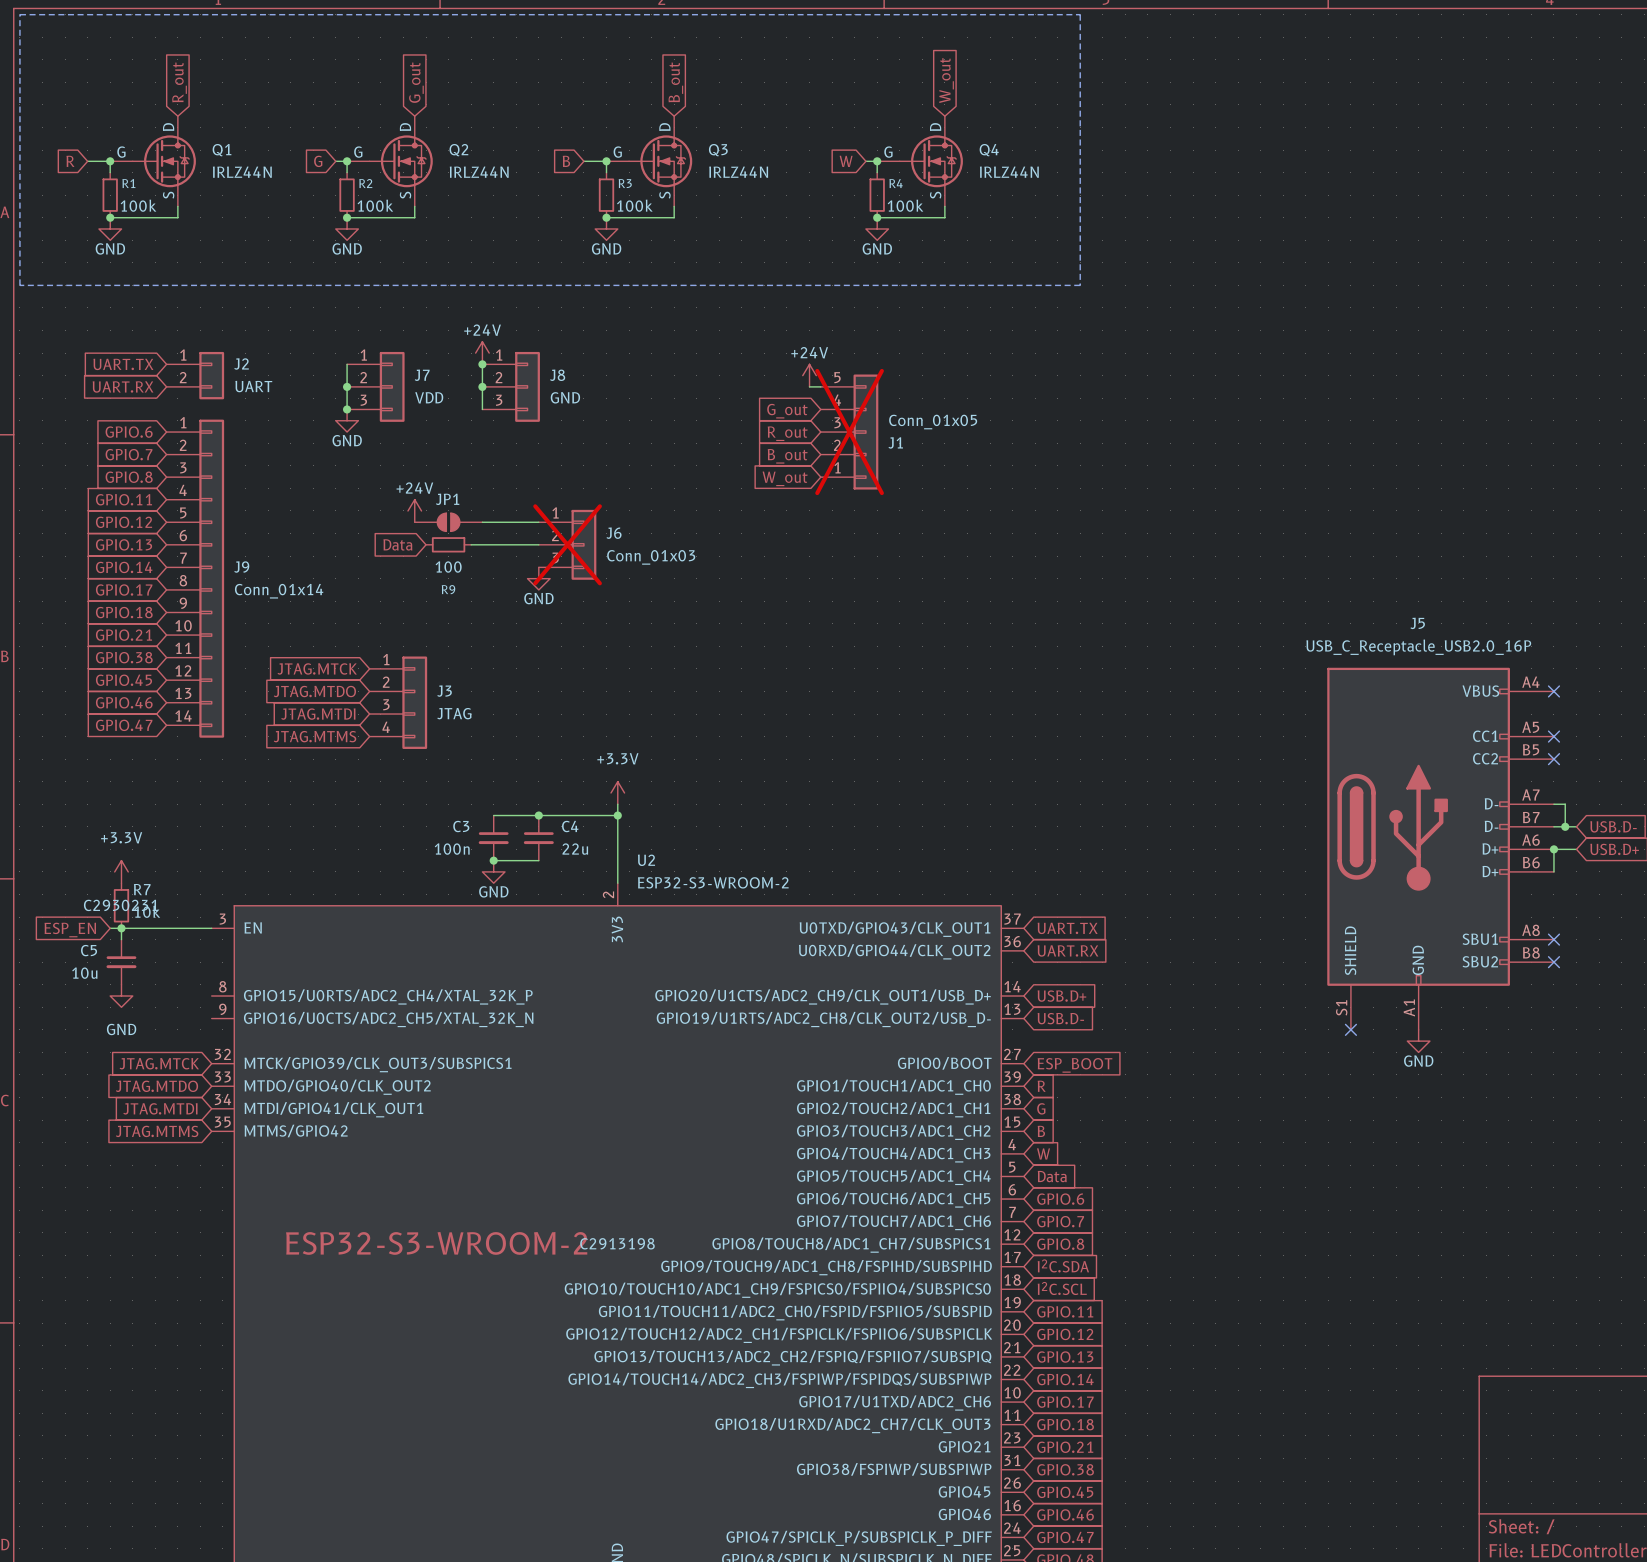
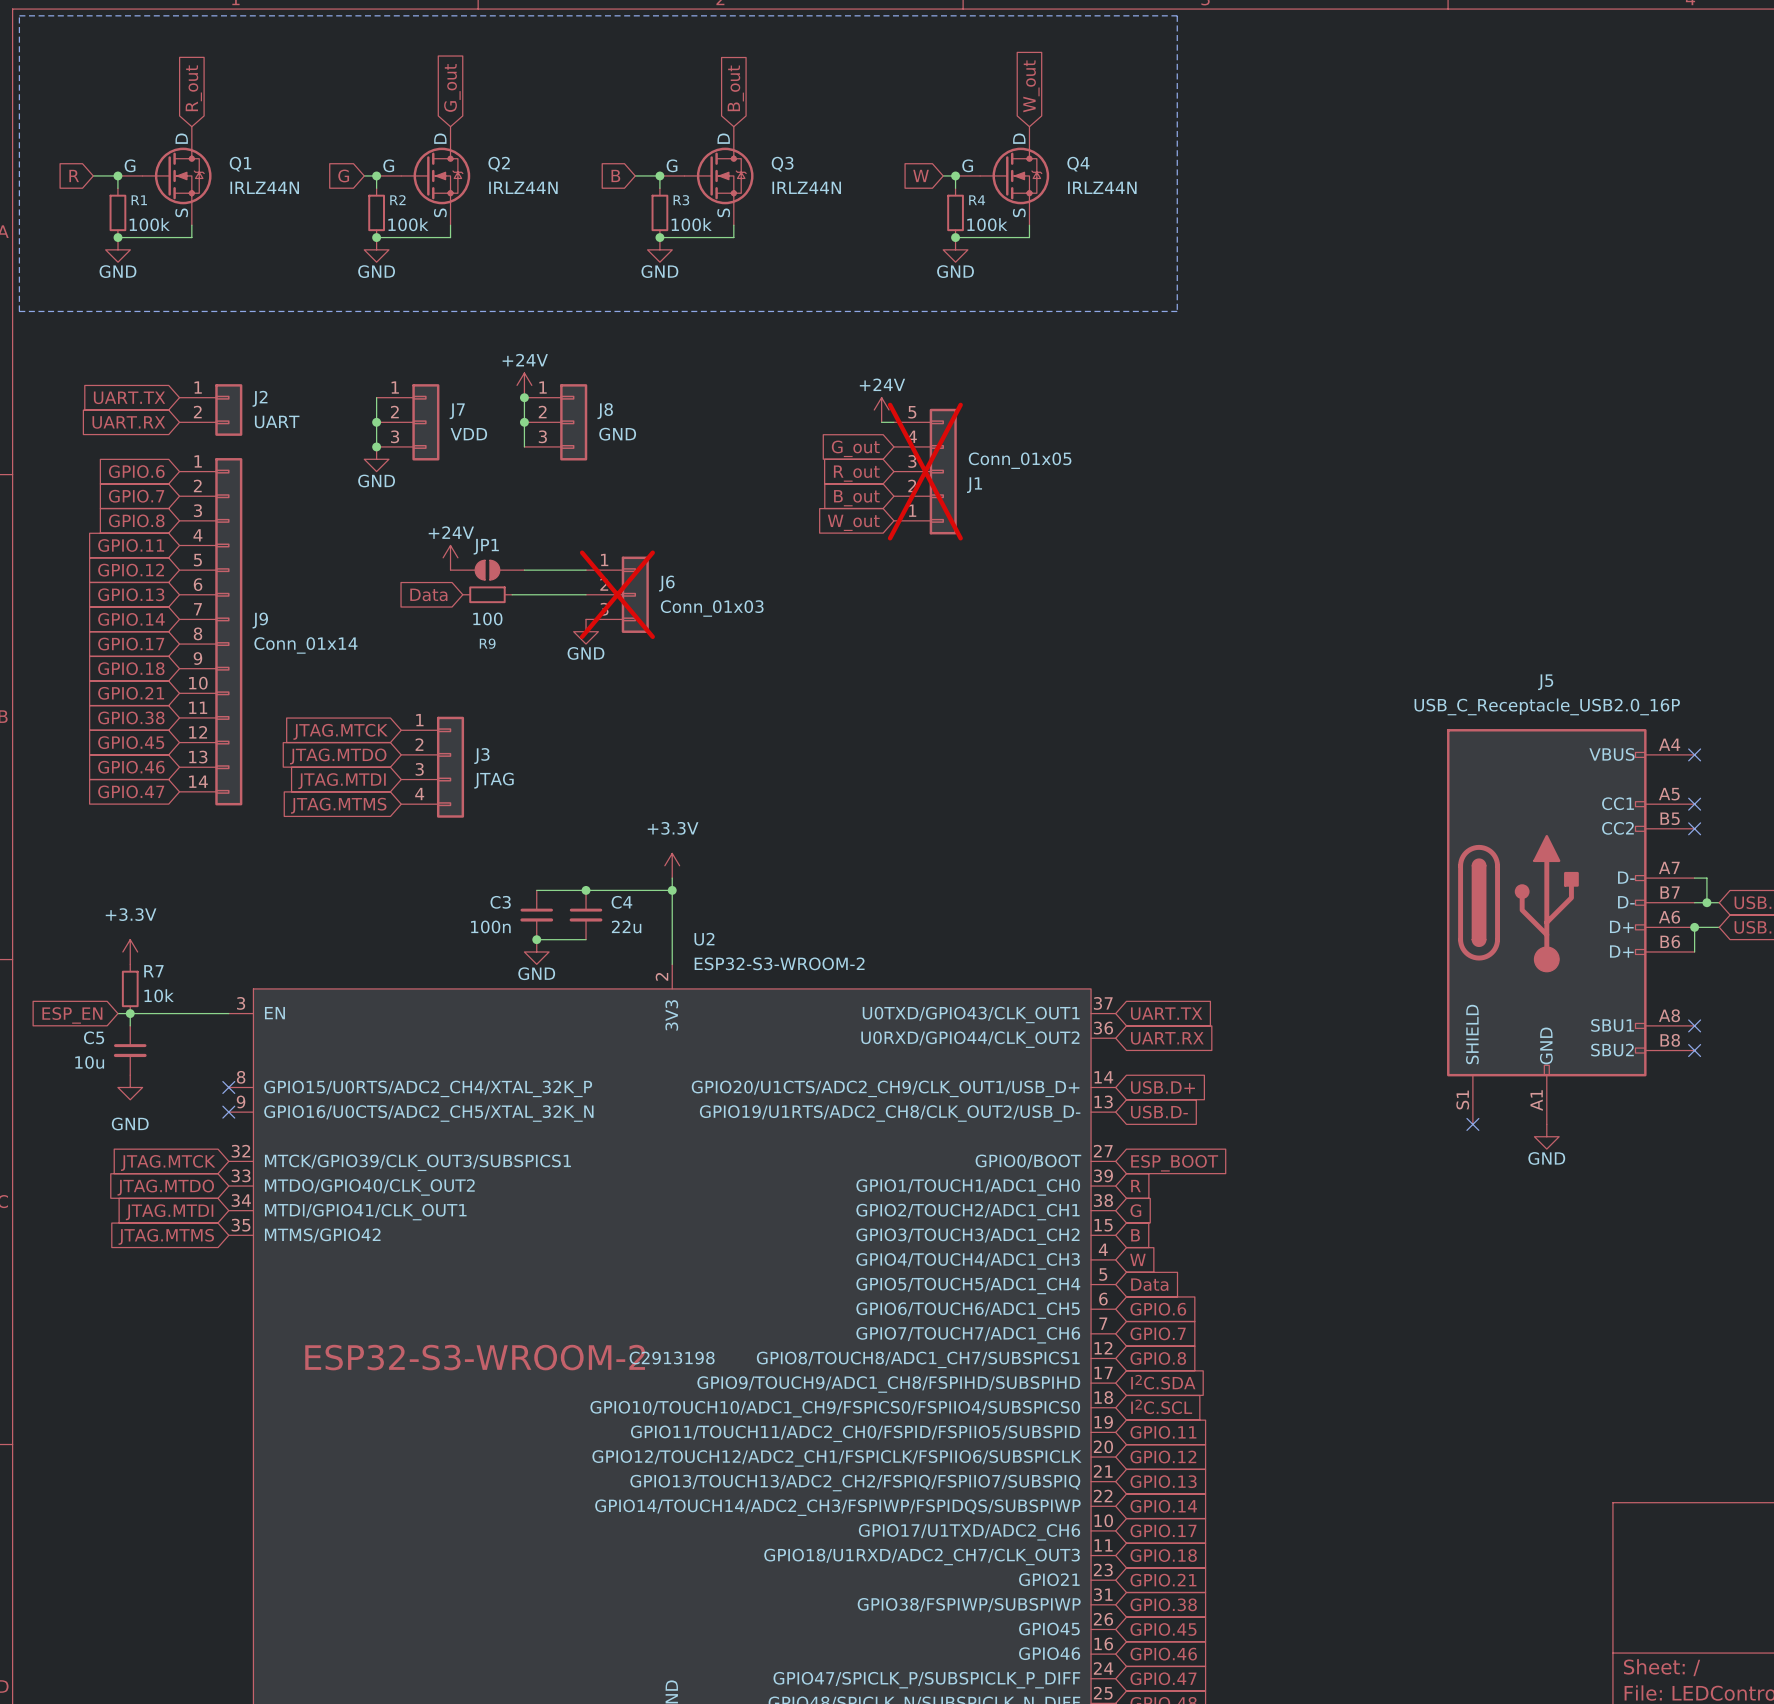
R7 text: C2930231 (120, 905) -> none
no-connect mark: none -> (228, 1087)
no-connect mark: none -> (228, 1112)

